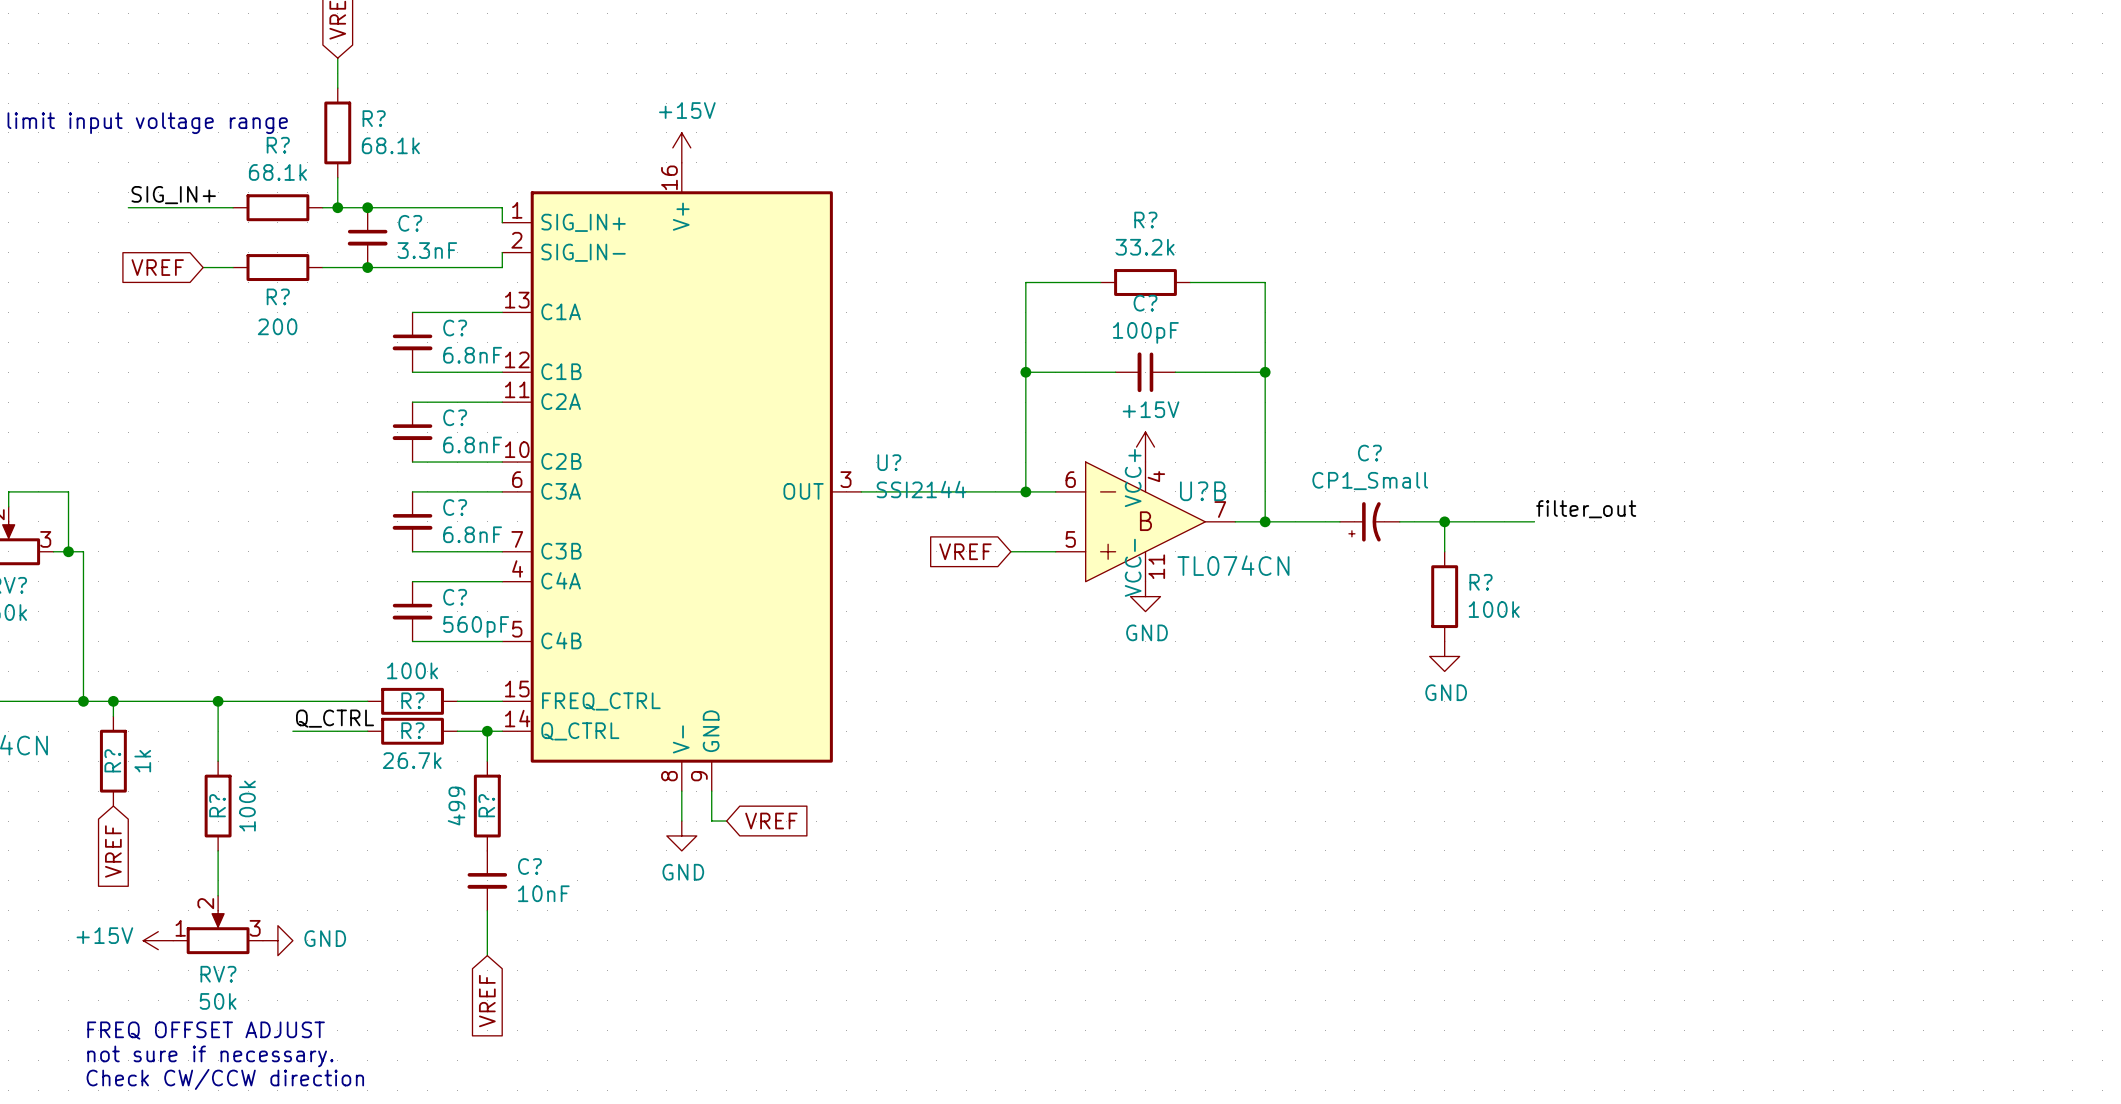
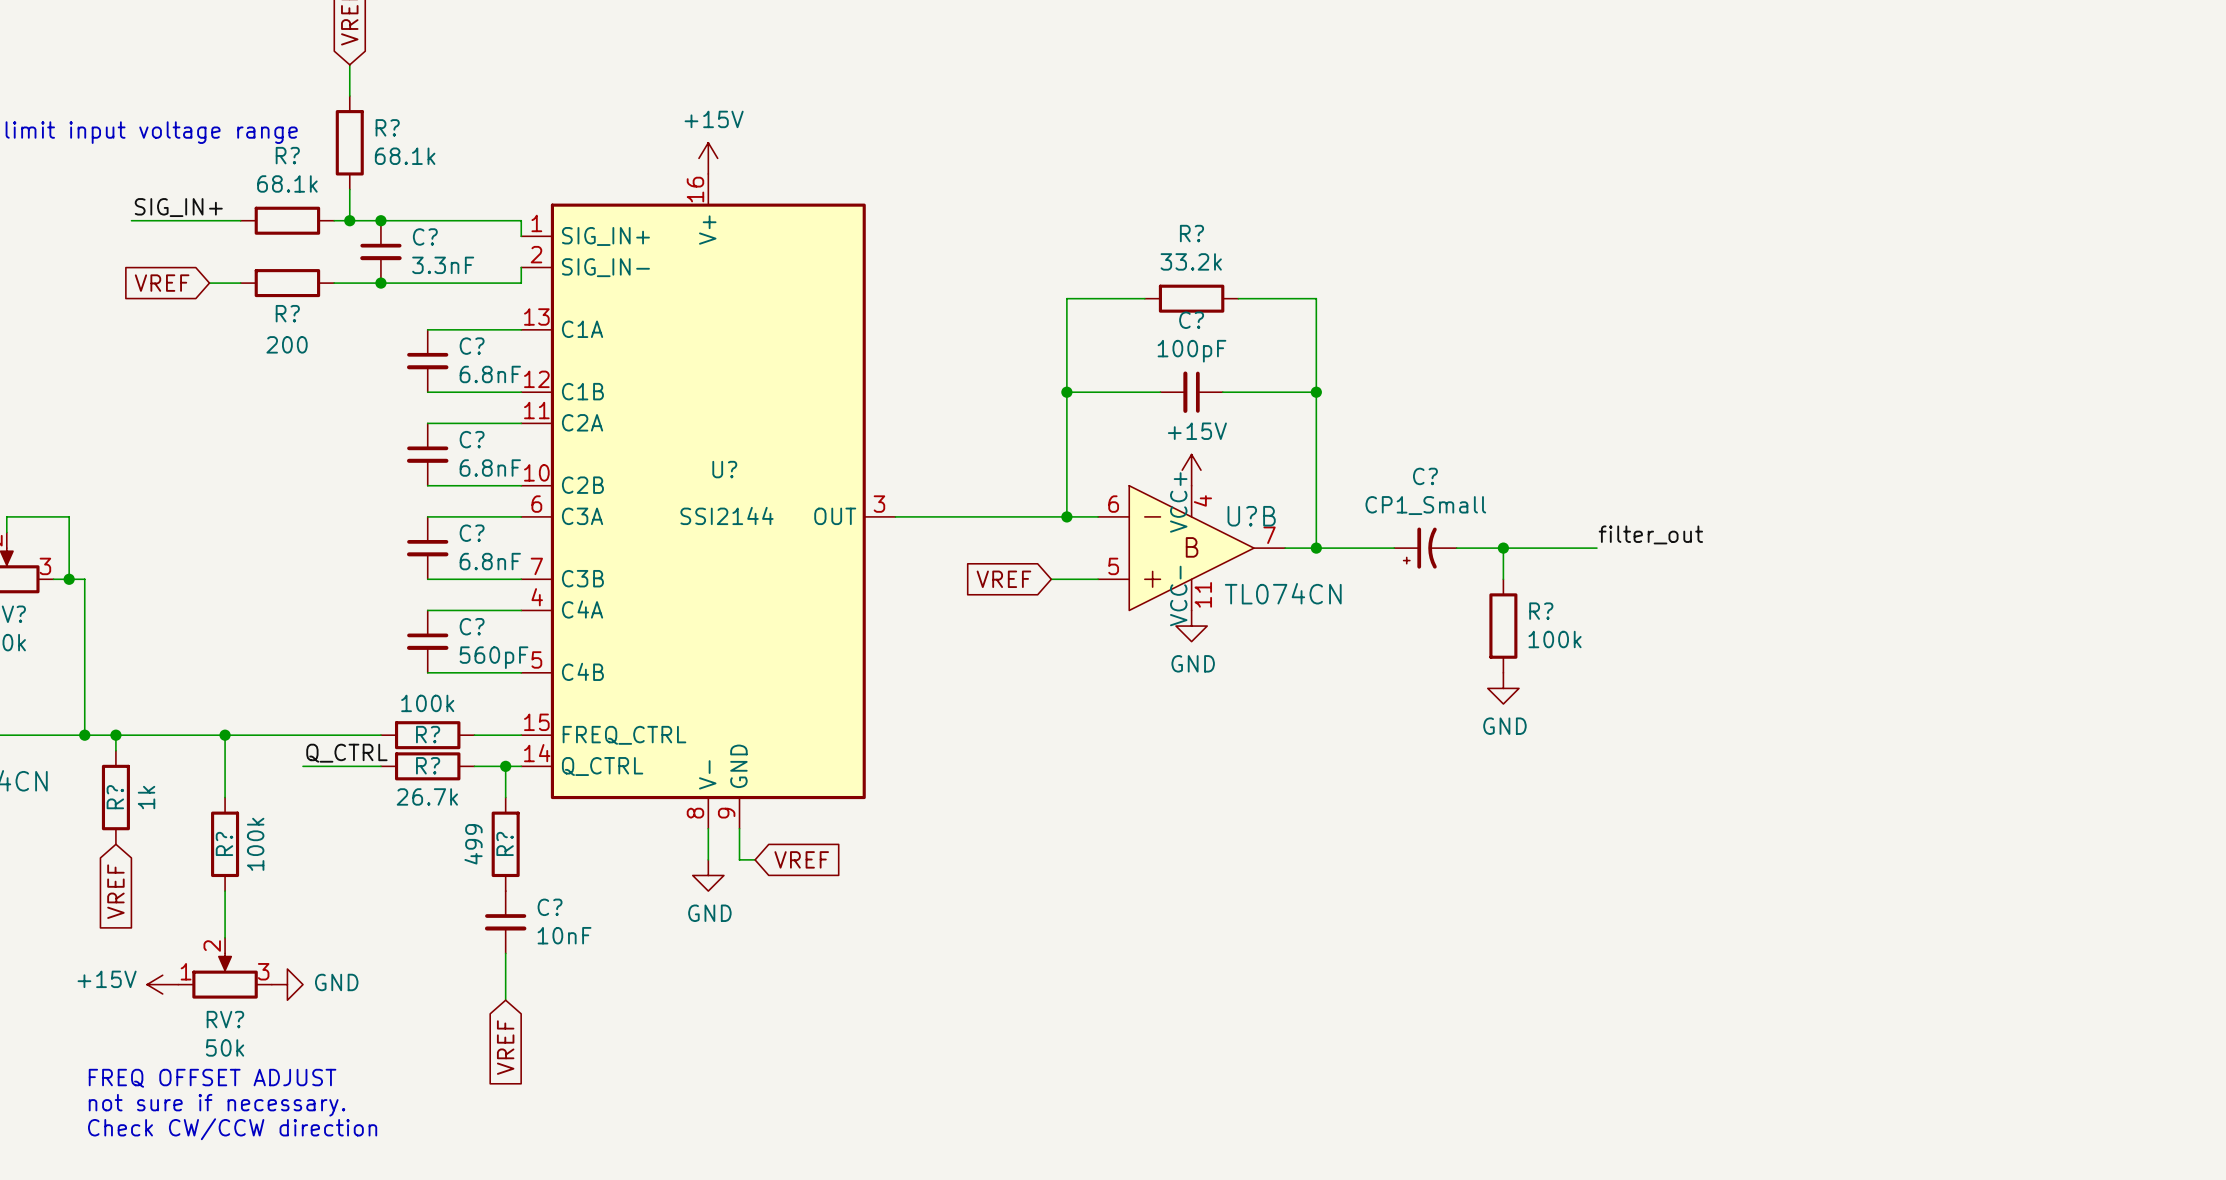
U? name position: U? (889, 462) -> U? (724, 469)
U? value position: SSI2144 (921, 489) -> SSI2144 (727, 515)

